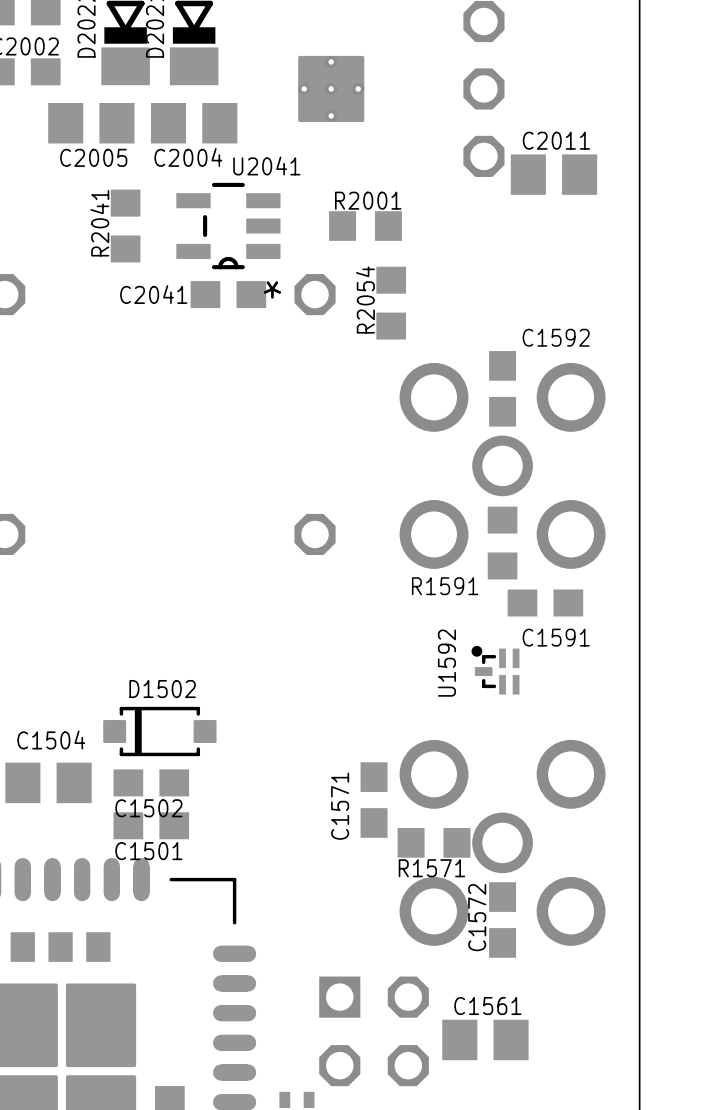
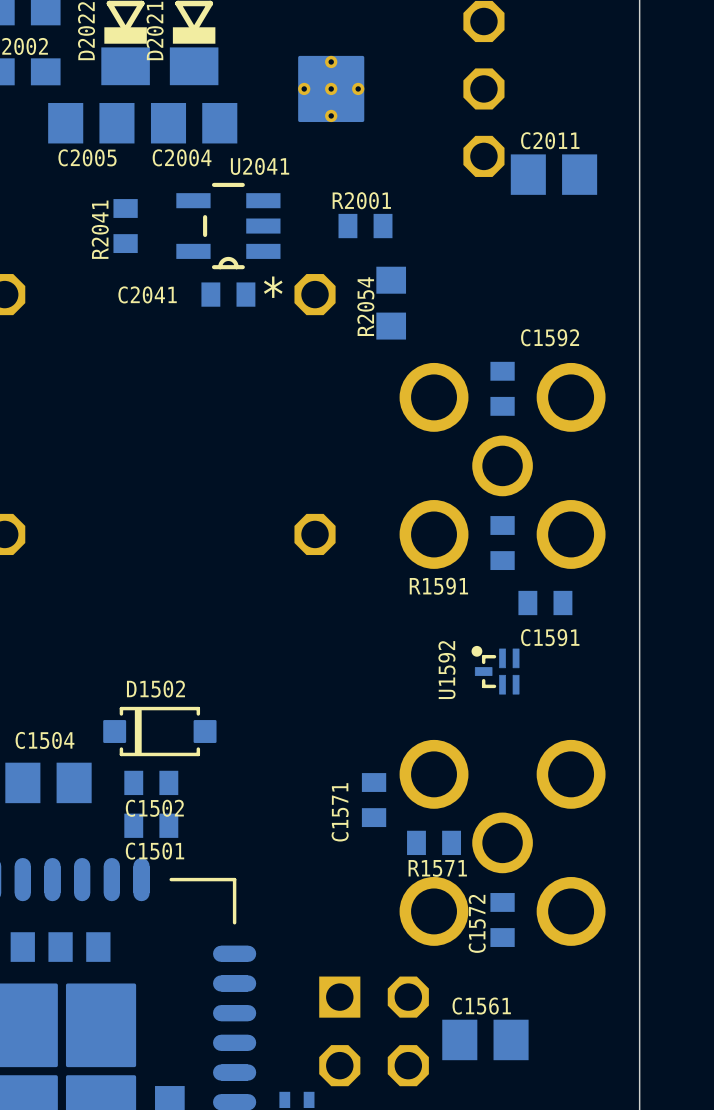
R2041 footprint: [110, 189, 141, 263] -> [113, 199, 138, 254]
R2001 footprint: [329, 211, 402, 241] -> [338, 213, 393, 239]
C2041 footprint: [190, 281, 267, 309] -> [201, 282, 256, 307]
C1592 footprint: [489, 351, 517, 427] -> [490, 361, 515, 416]
R1591 footprint: [487, 506, 518, 580] -> [490, 516, 515, 571]
C1591 footprint: [507, 589, 584, 617] -> [518, 590, 573, 616]
C1571 footprint: [360, 762, 388, 838] -> [361, 773, 387, 828]
C1502 footprint: [113, 769, 190, 797] -> [124, 770, 179, 796]
C1501 footprint: [113, 812, 190, 840] -> [124, 813, 179, 838]
R1571 footprint: [397, 828, 471, 858] -> [407, 830, 462, 856]
C1572 footprint: [489, 882, 517, 958] -> [490, 893, 515, 947]

